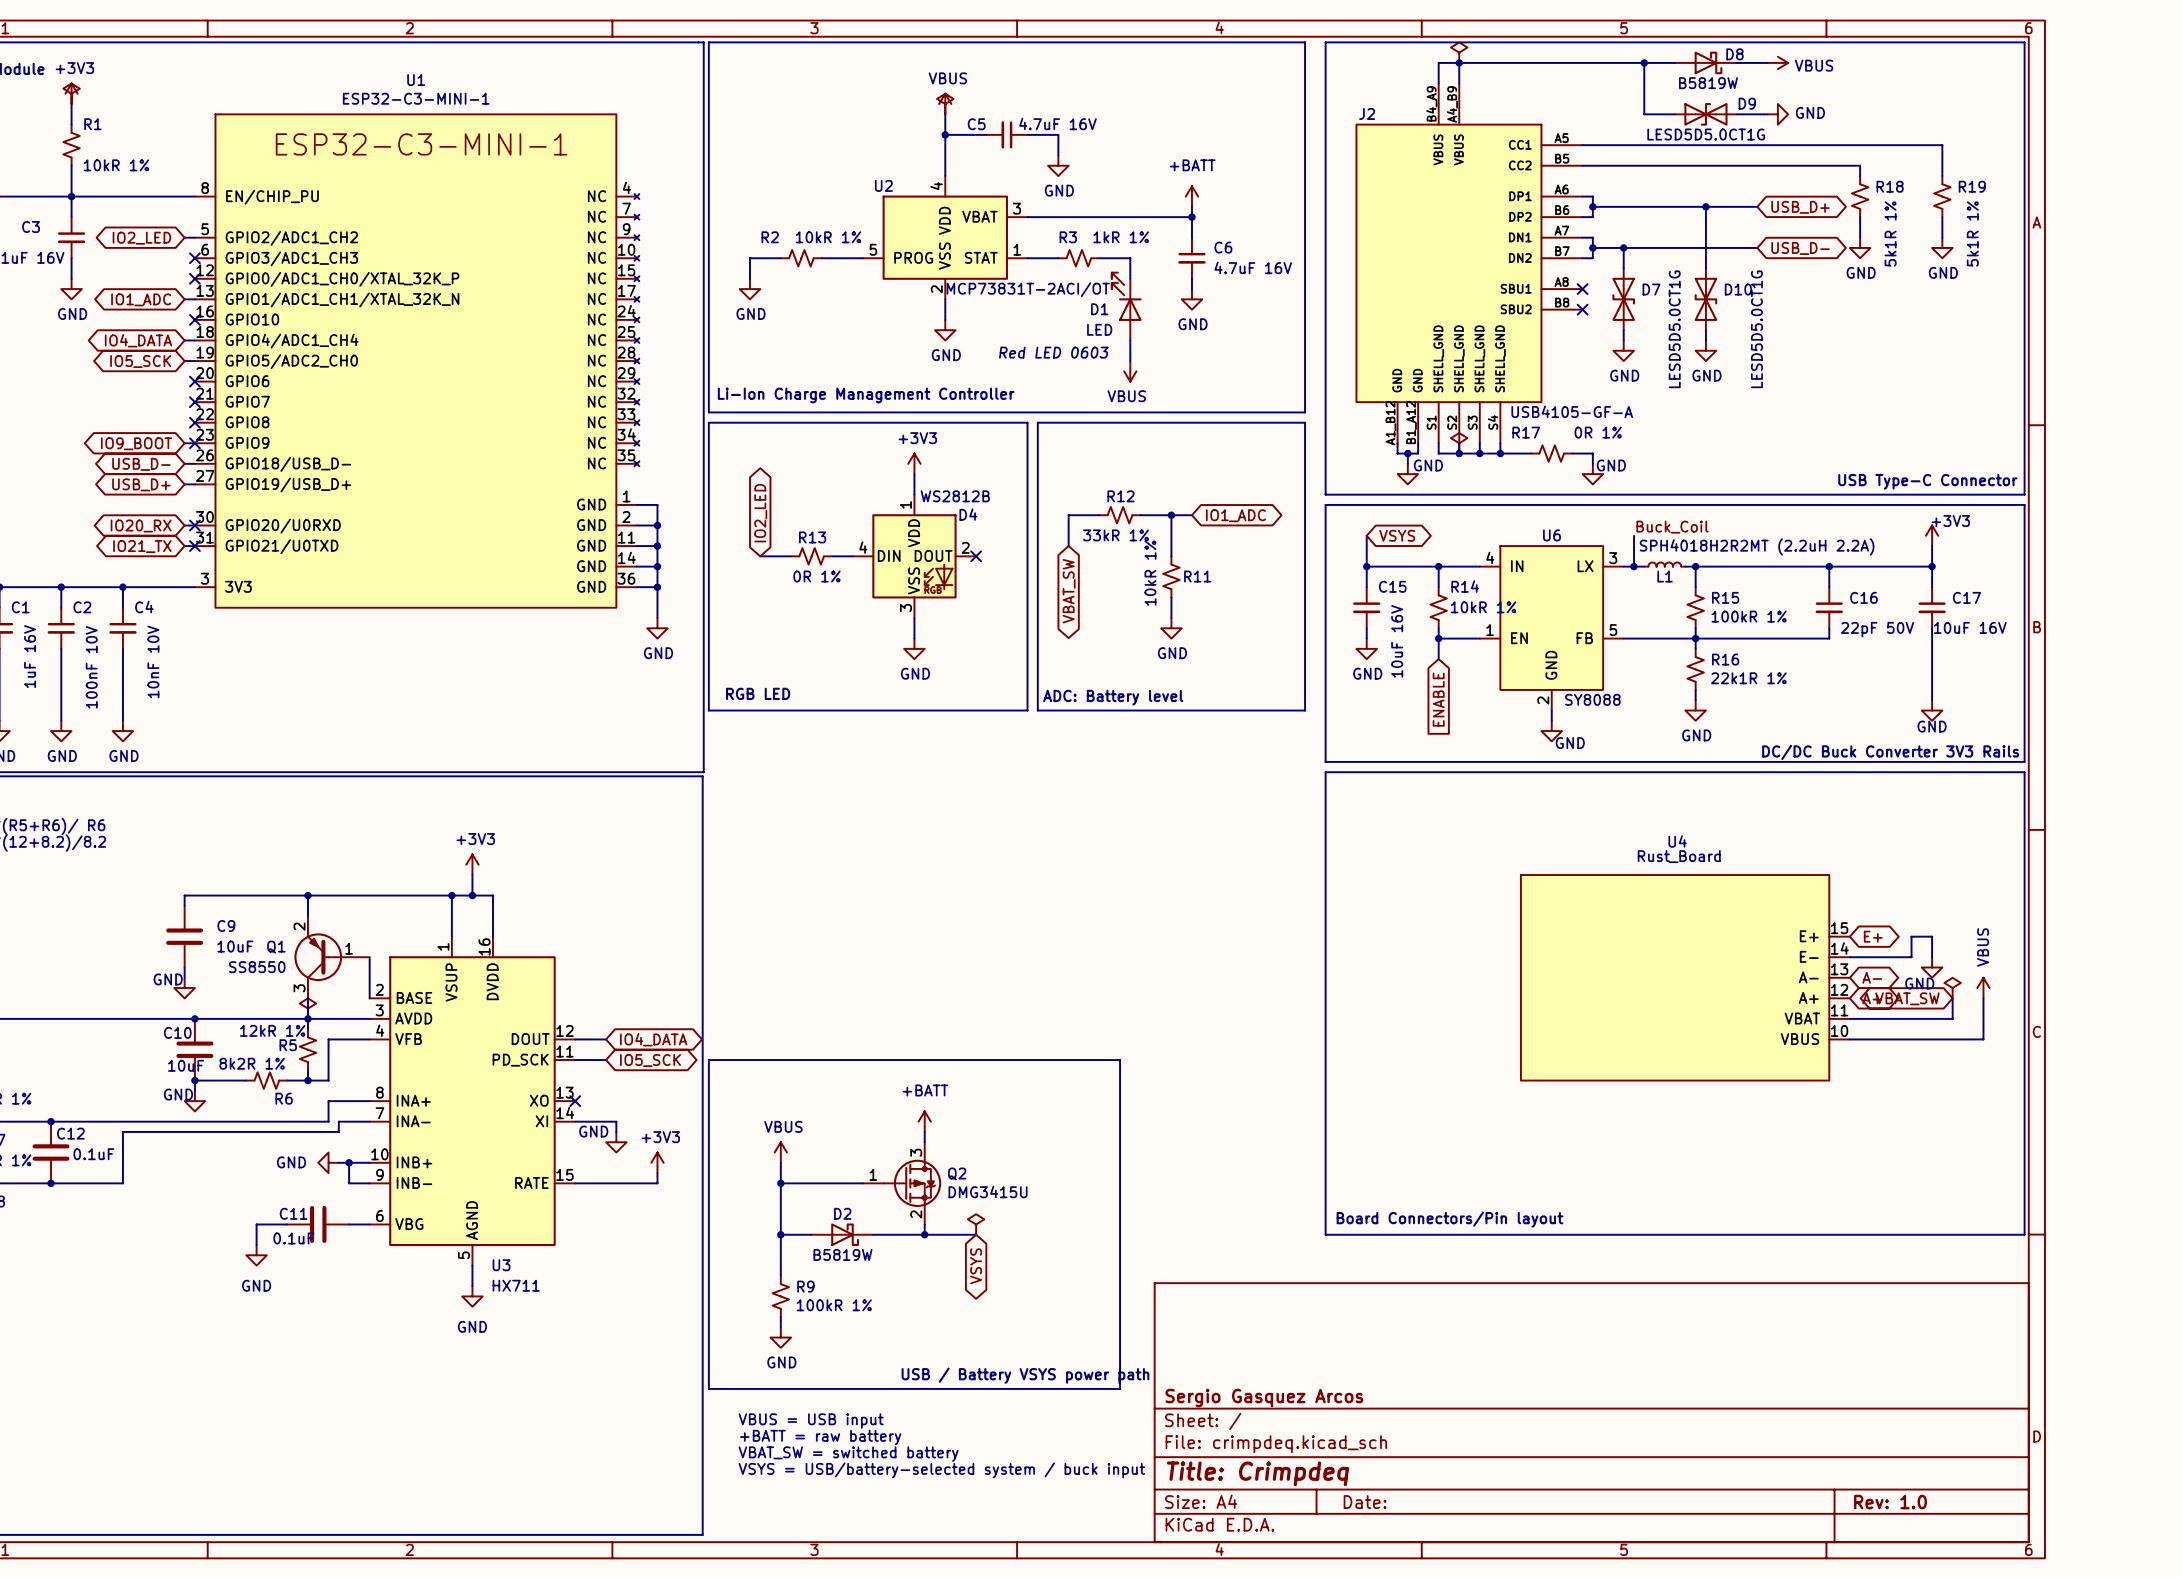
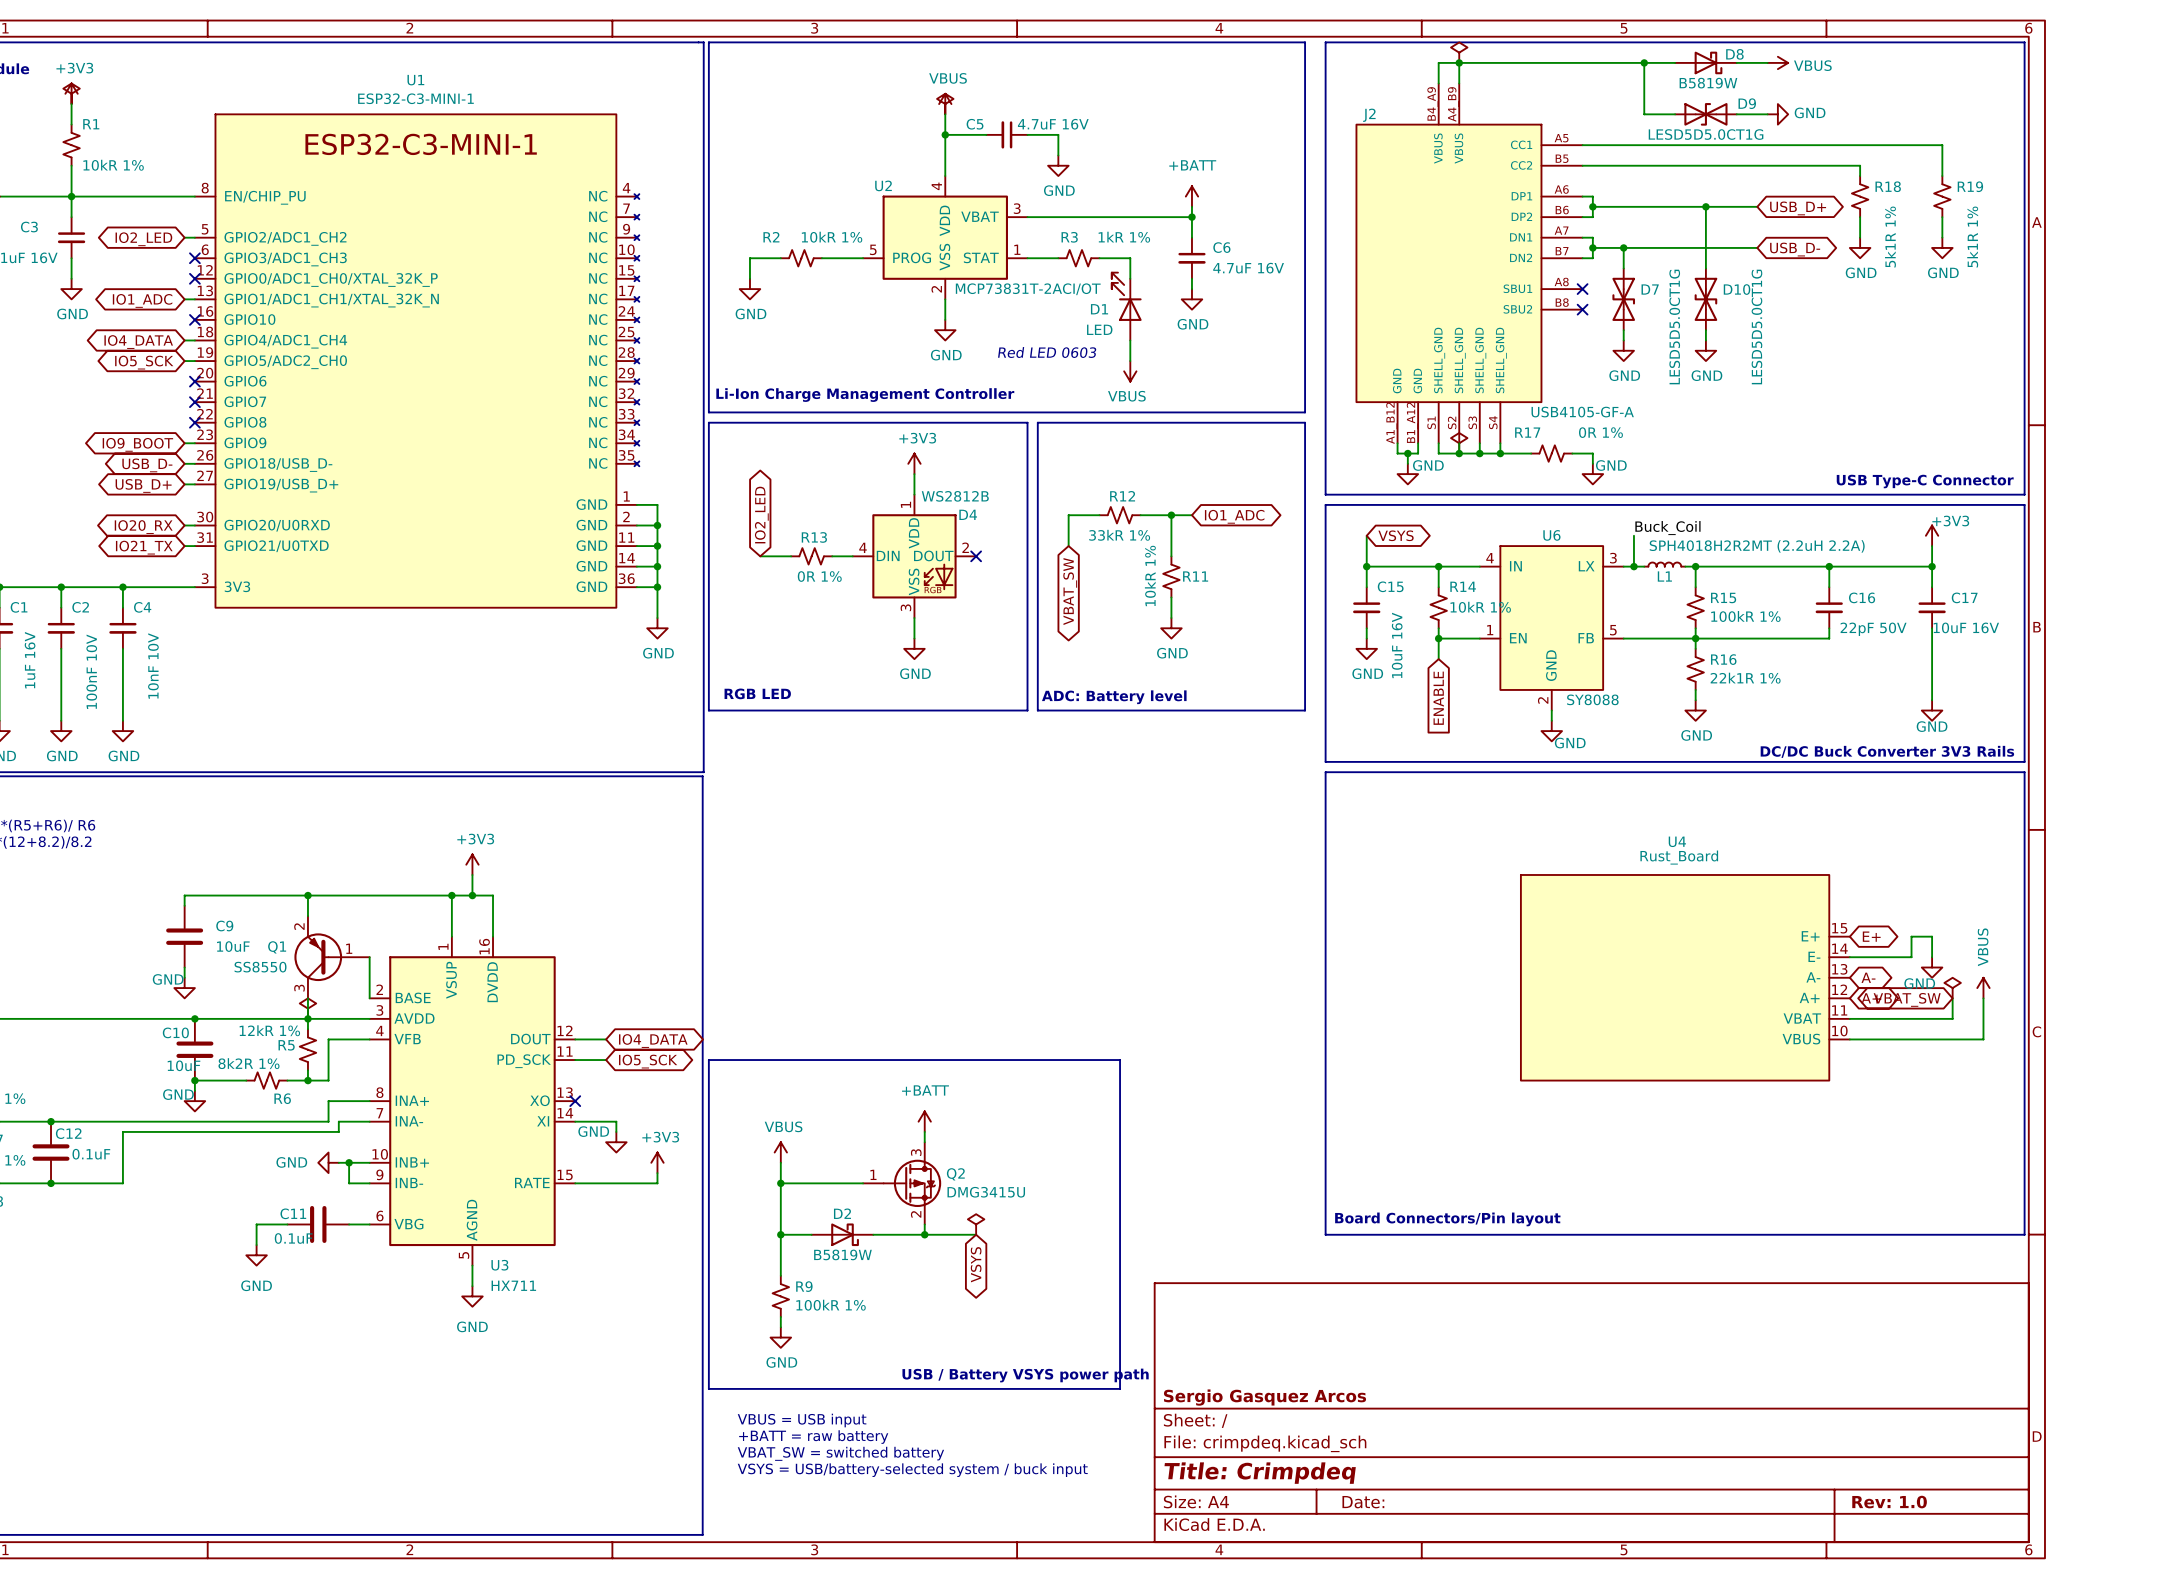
no-connect mark: (194, 443) -> none
no-connect mark: (194, 525) -> none
no-connect mark: (194, 546) -> none

